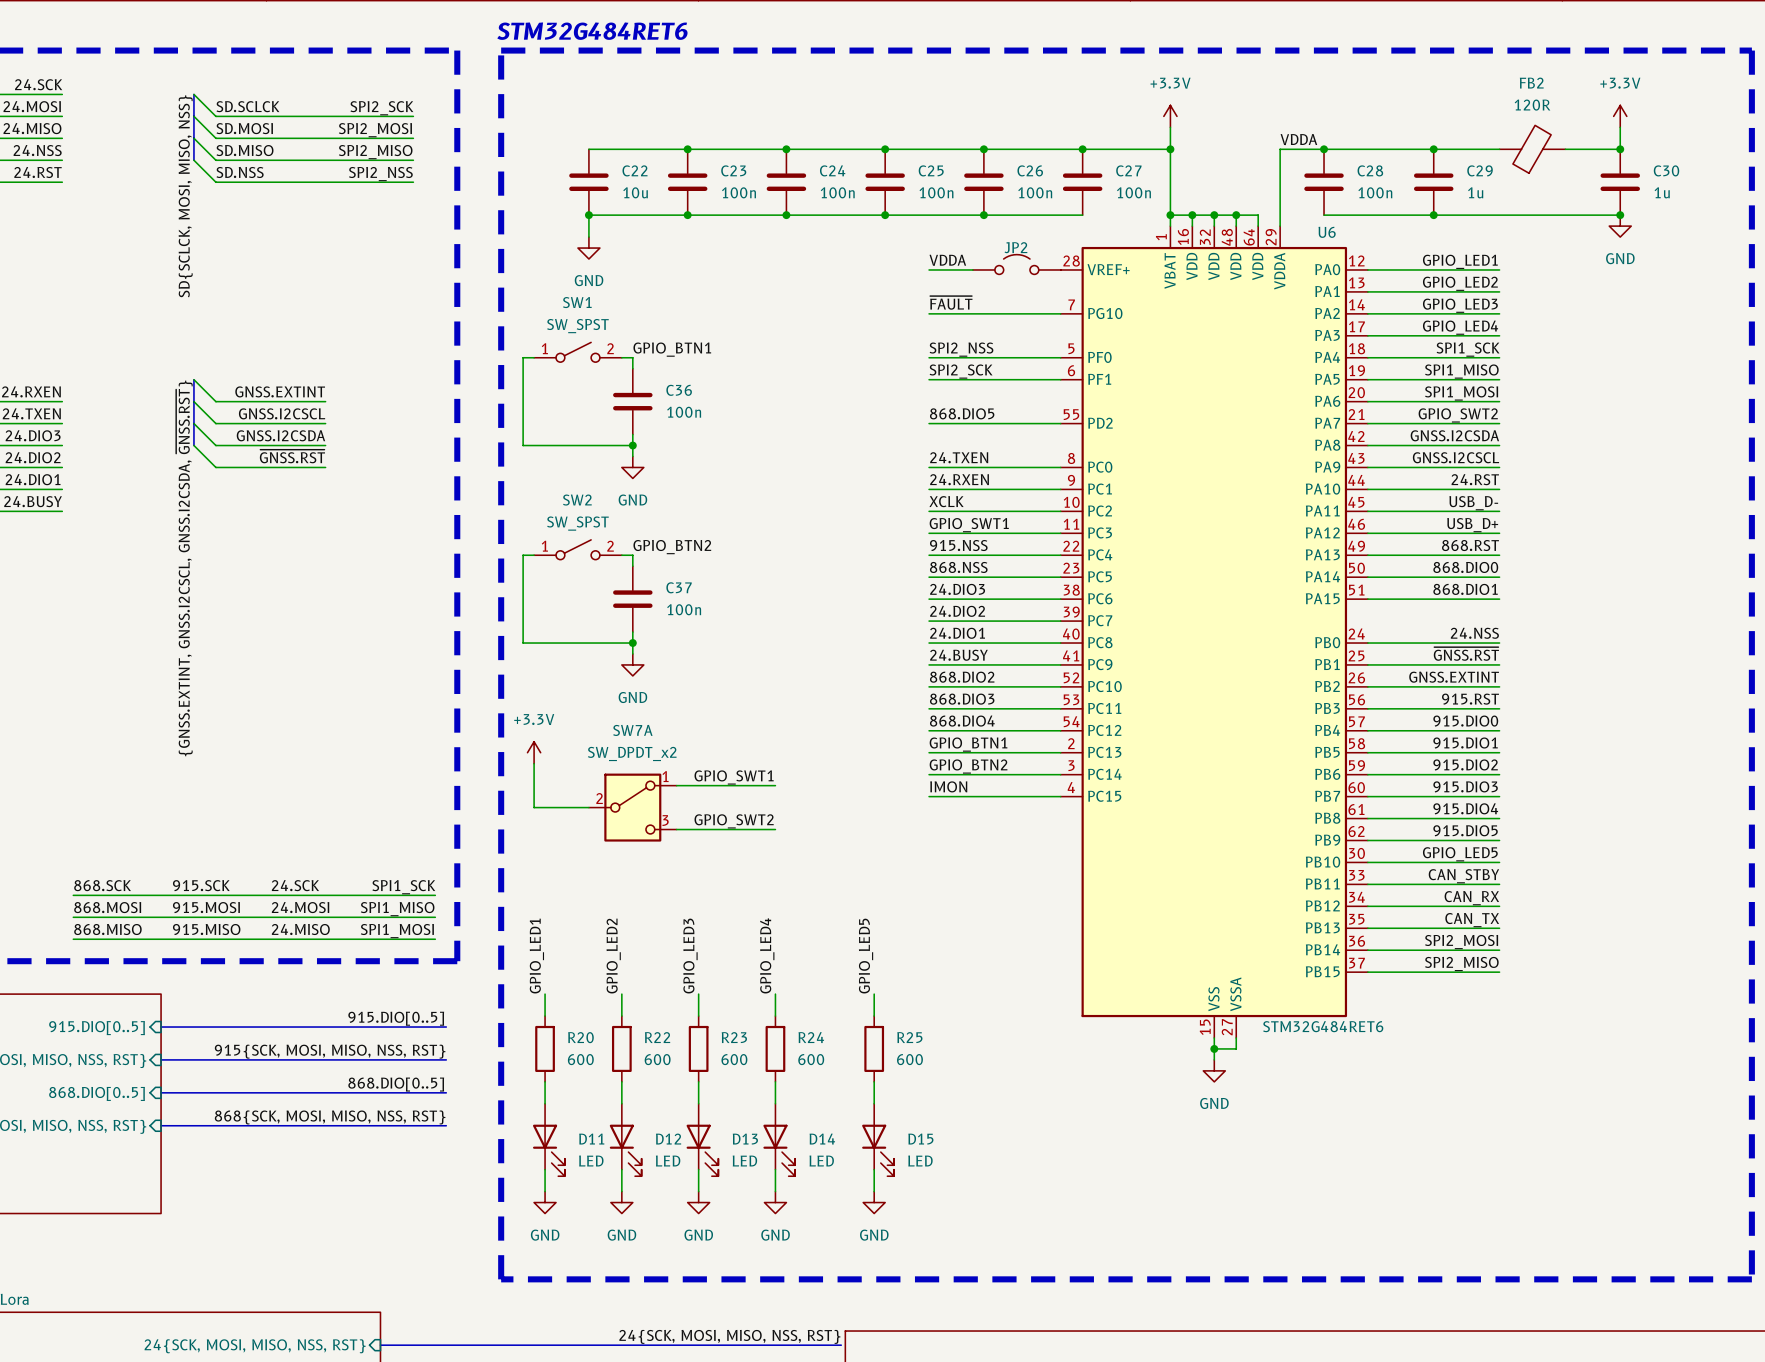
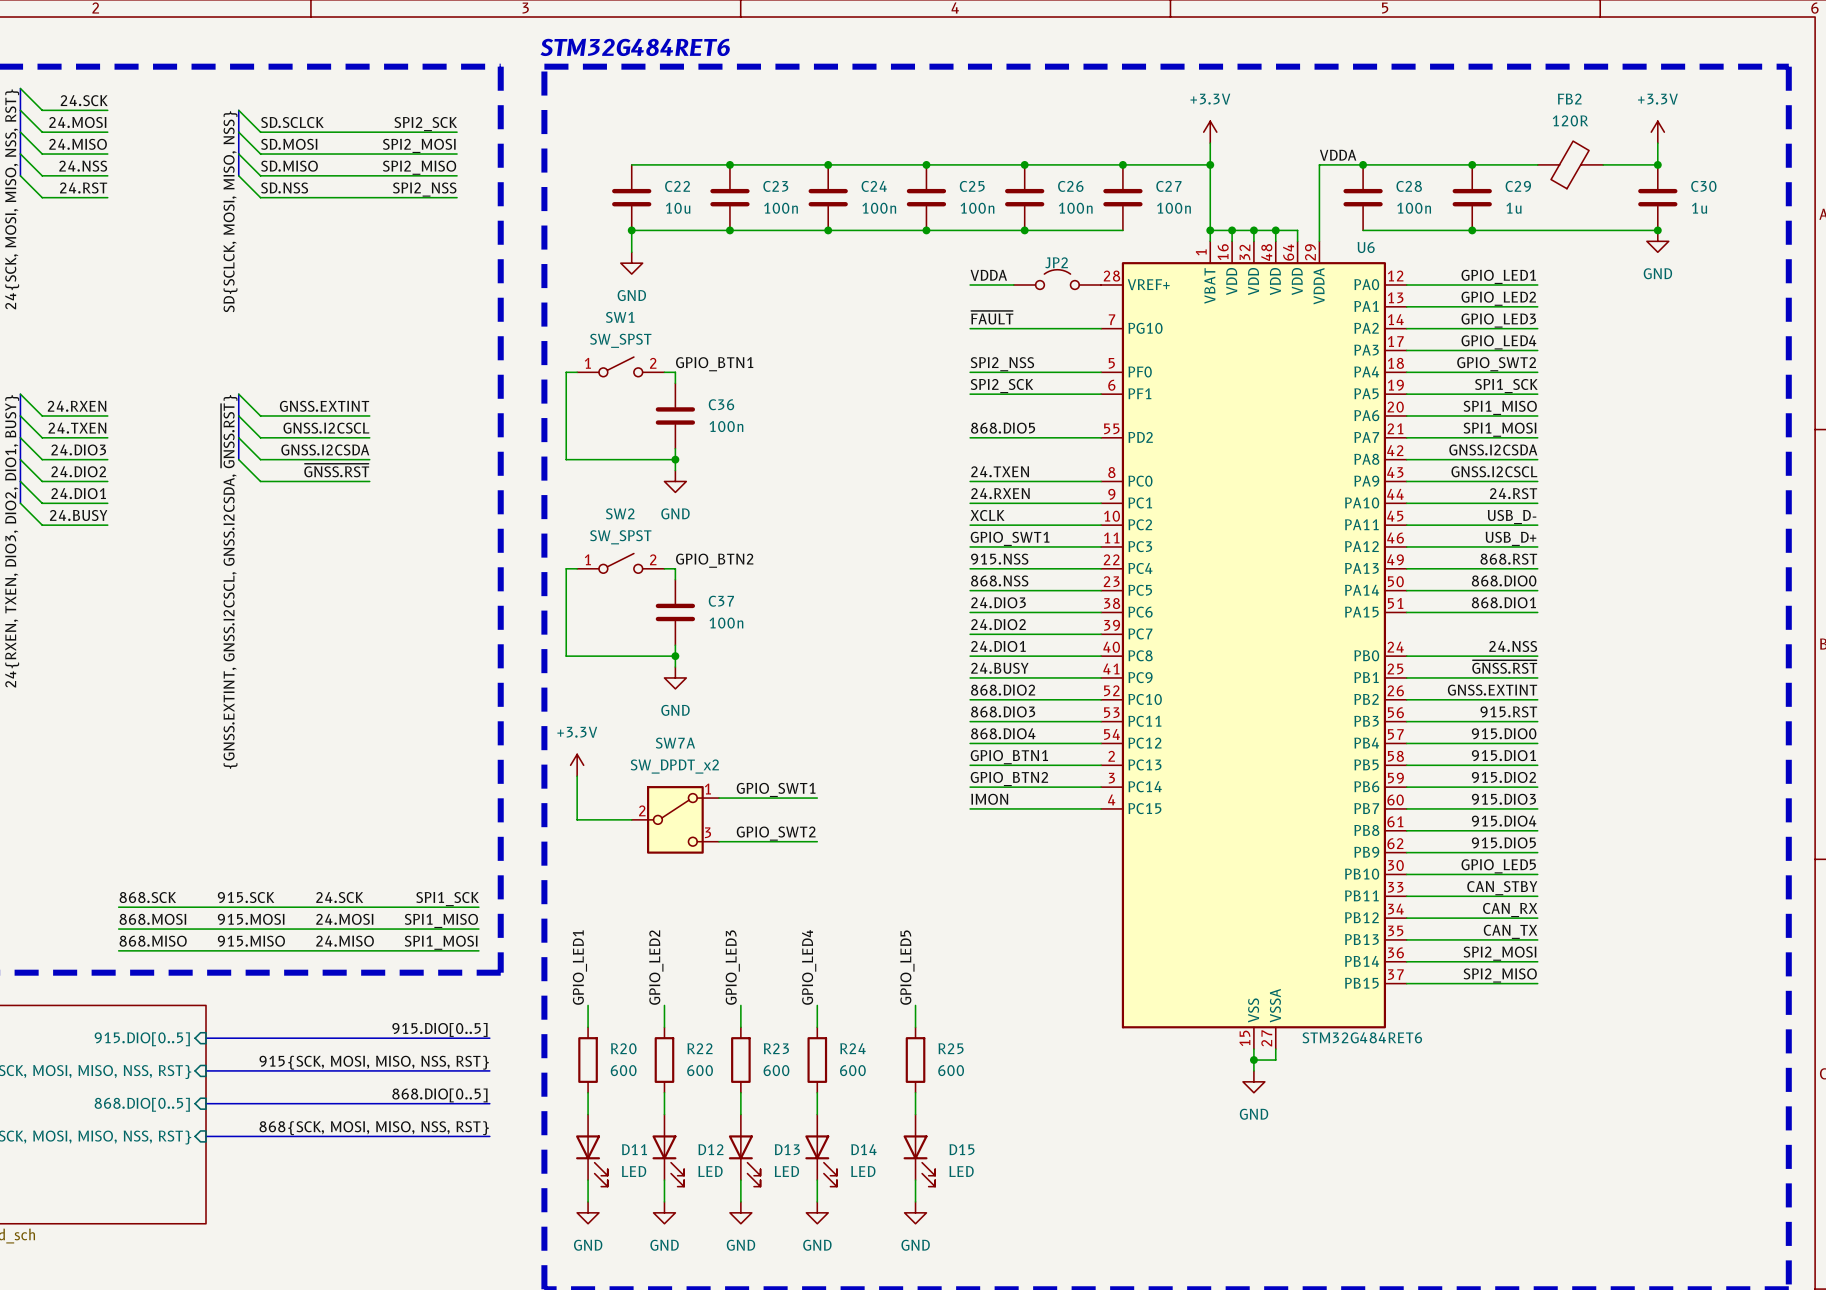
label: SPI1_SCK (1468, 349) -> GPIO_SWT2 (1496, 364)
label: SPI1_MISO (1461, 371) -> SPI1_SCK (1506, 386)
label: SPI1_MOSI (1461, 393) -> SPI1_MISO (1500, 407)
label: GPIO_SWT2 (1458, 415) -> SPI1_MOSI (1499, 429)

